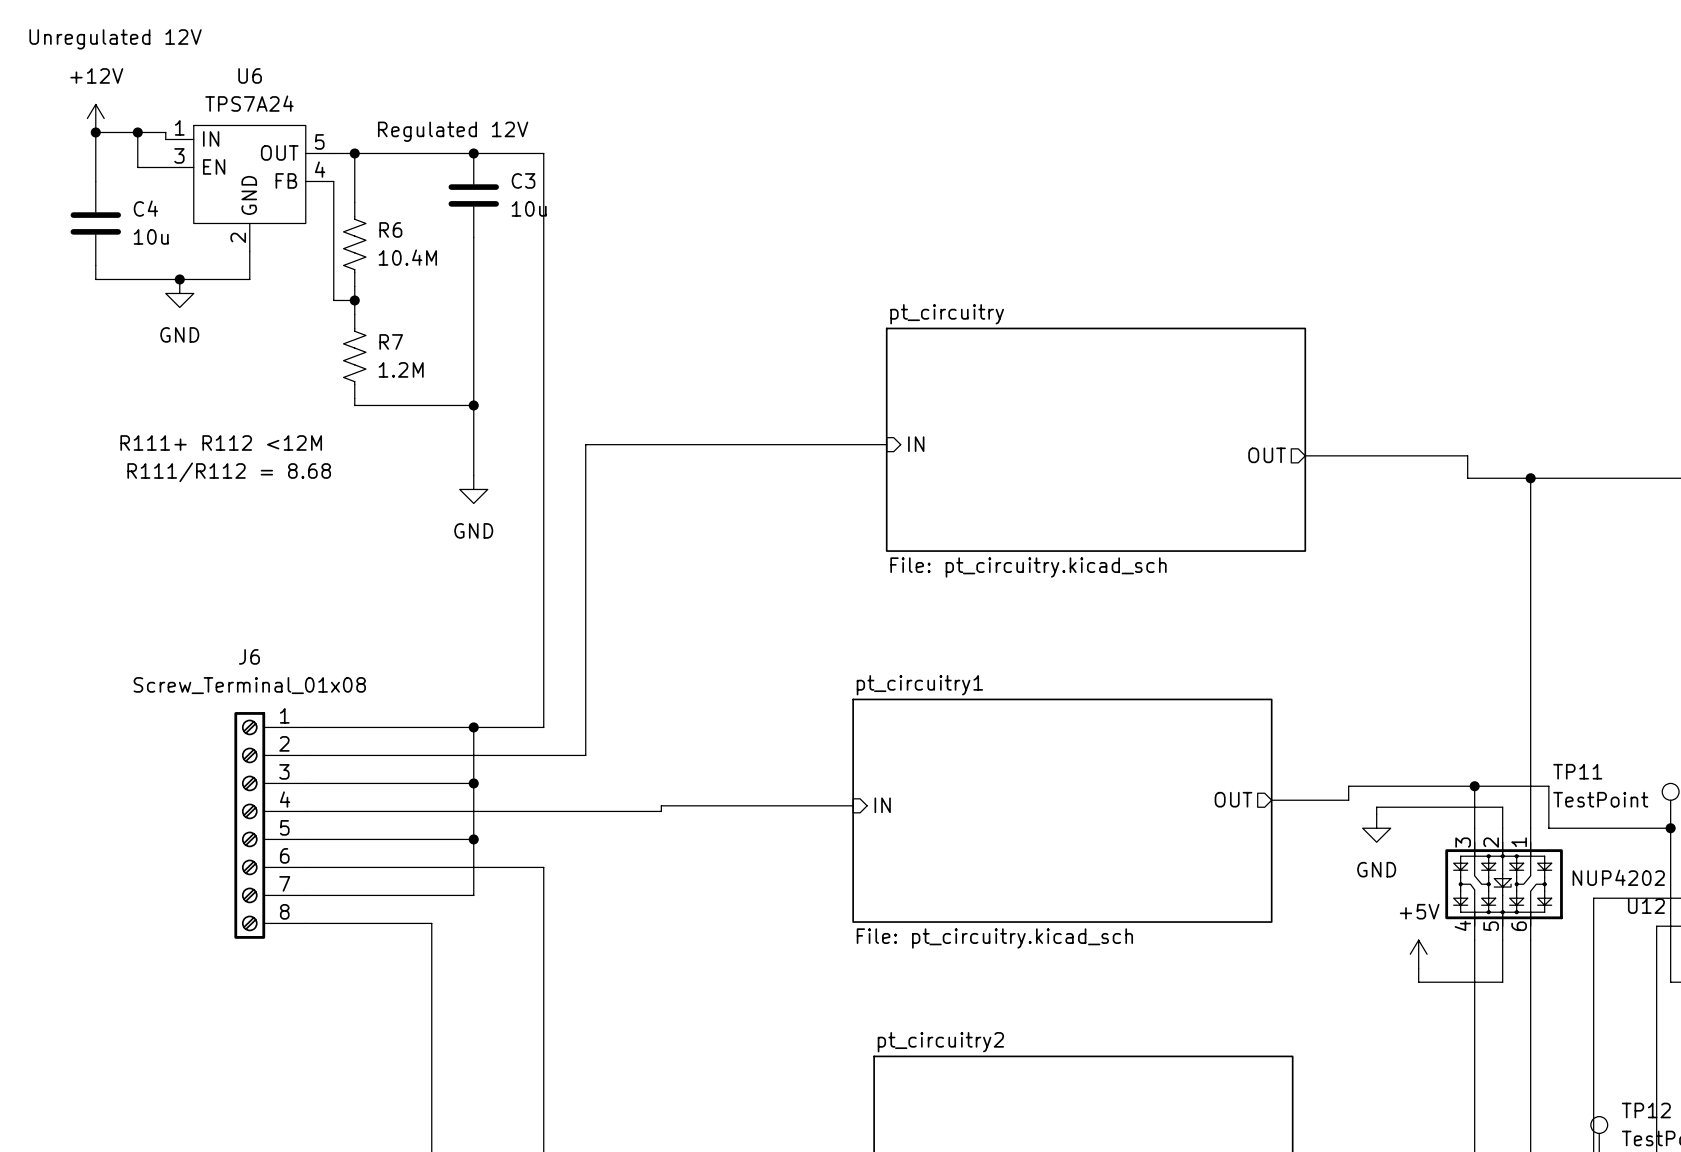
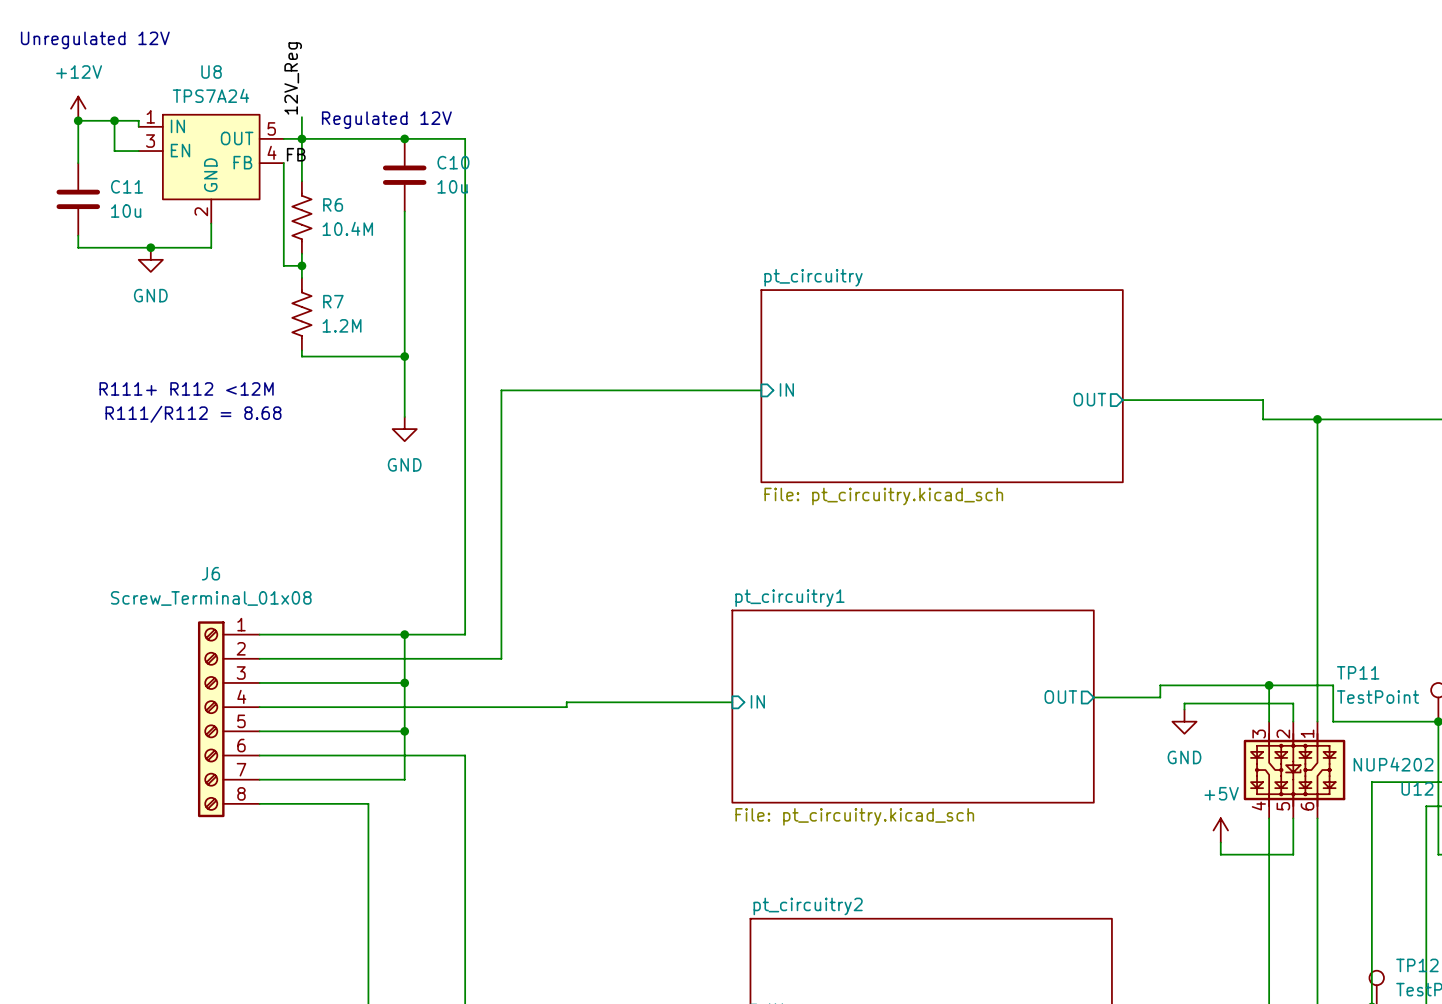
U6 name: U6 (250, 75) -> U8 (211, 71)
label: none -> 12V_Reg (293, 78)
wire: none -> (301, 117) (301, 138)
label: none -> FB (296, 154)
C3 name: C3 (523, 180) -> C10 (453, 162)
C4 name: C4 (145, 208) -> C11 (127, 186)

